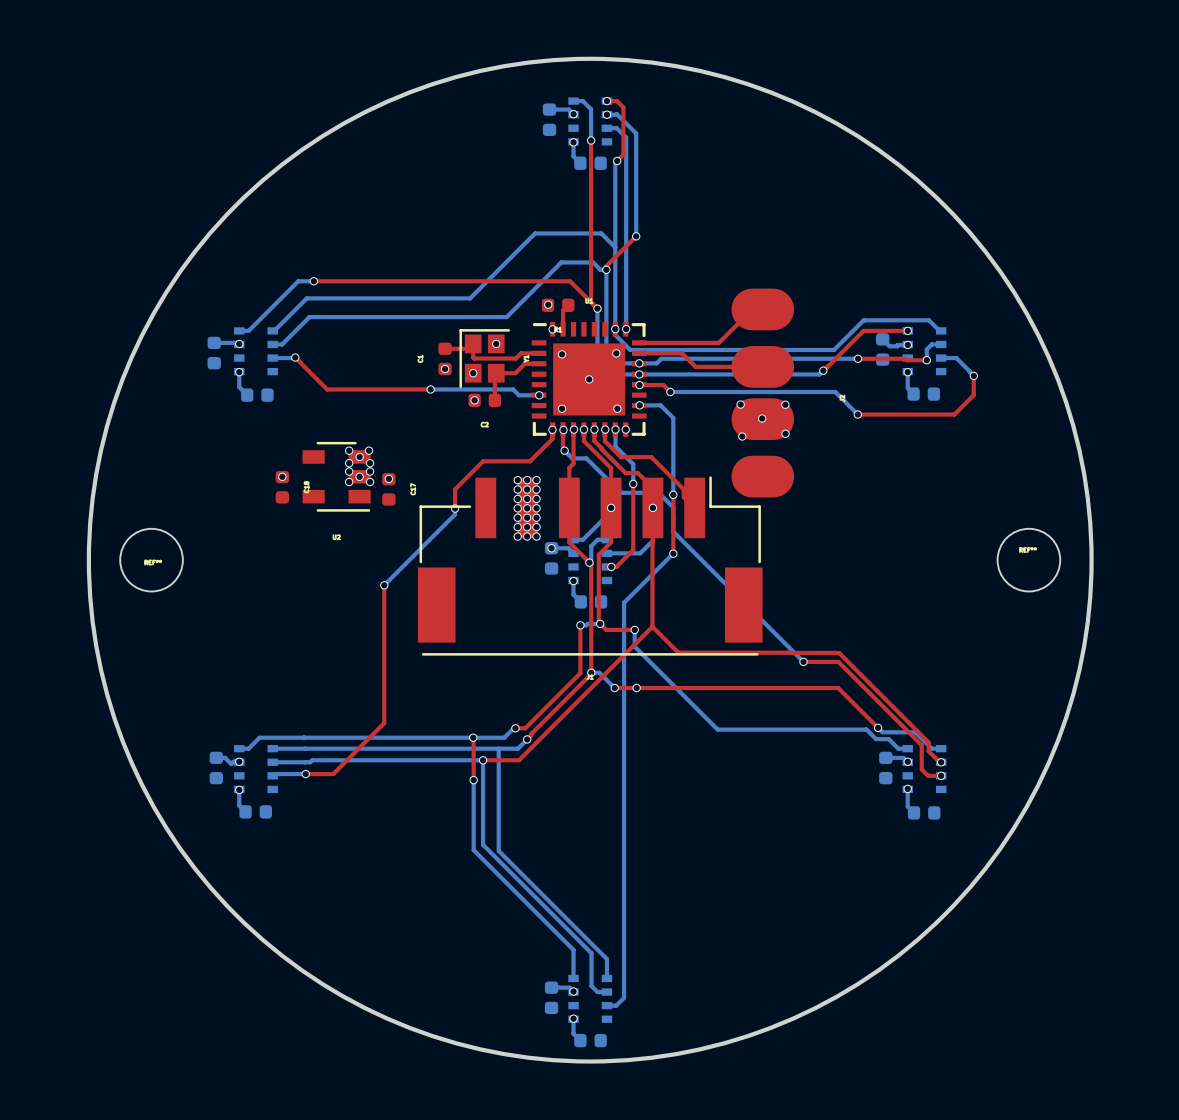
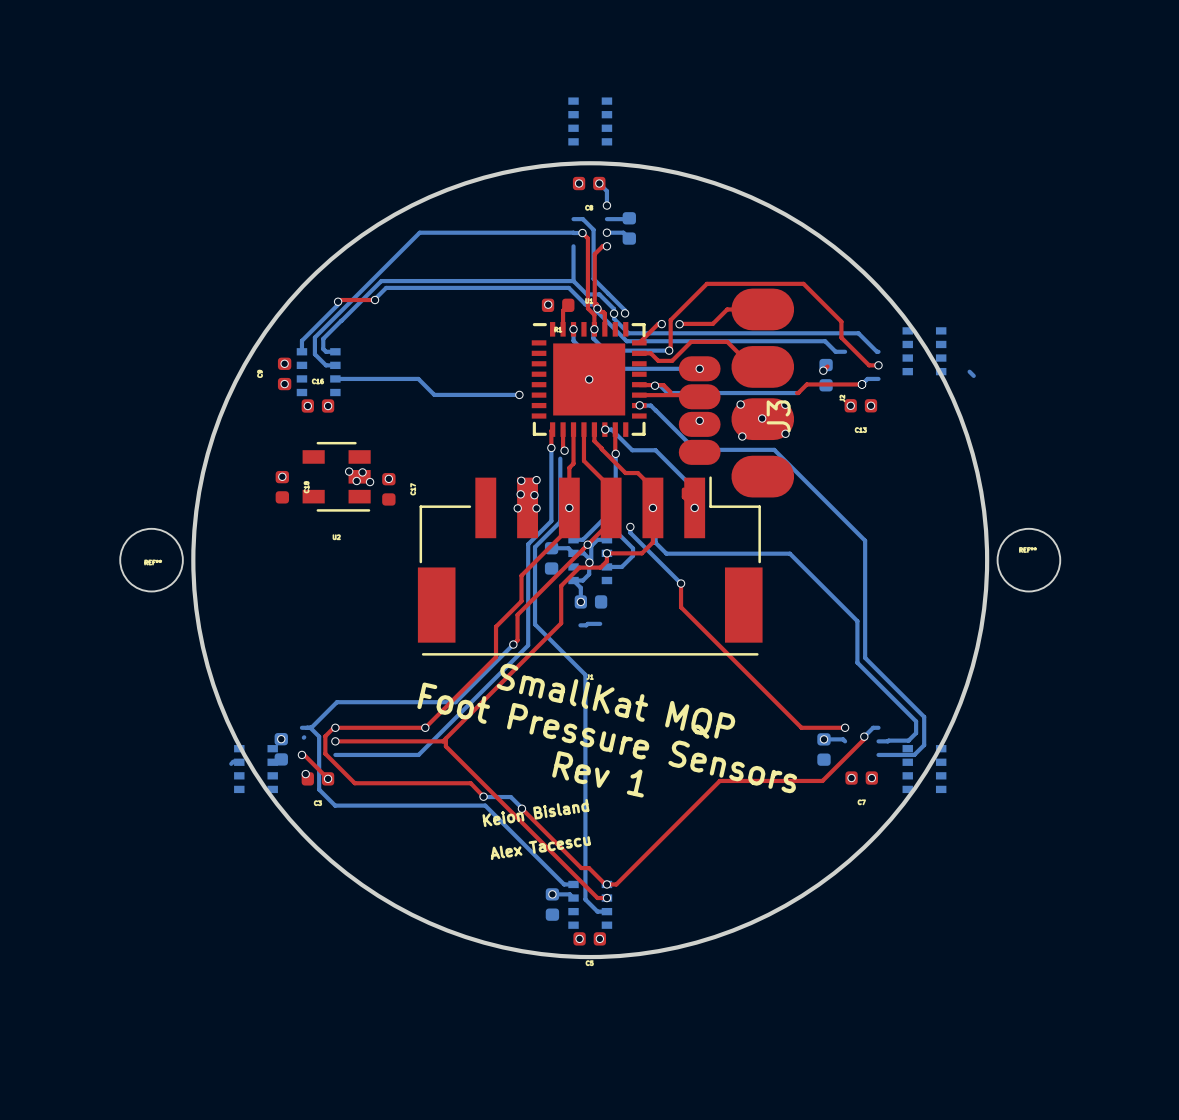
round board edge size: [86, 56, 1094, 1064] -> [191, 161, 990, 960]
bottom track: (573, 101) (582, 101) (591, 109) (591, 140) -> none
top track: (606, 101) (617, 101) (623, 107) (623, 154) (617, 160) -> none
via: (606, 101) -> none
bottom track: (549, 109) (568, 109) (573, 114) -> none
via: (573, 114) -> none
bottom track: (606, 114) (616, 114) (636, 133) (636, 236) -> none
via: (606, 114) -> none
part position: (549, 119) -> (629, 228)
bottom track: (606, 128) (616, 128) (626, 137) (626, 329) -> none
top track: (591, 140) (591, 302) -> none
via: (591, 140) -> none
bottom track: (573, 141) (573, 156) (580, 163) -> none
via: (573, 142) -> none
bottom track: (617, 160) (615, 162) (615, 335) (630, 350) (834, 350) (863, 320) (929, 320) (941, 330) -> none
via: (617, 160) -> none
part side: bottom (590, 163) -> top (589, 183)
via: none -> (579, 183)
bottom track: none -> (599, 183) (606, 191) (606, 205)
via: none -> (599, 183)
via: none -> (606, 205)
bottom track: none -> (629, 218) (606, 219)
bottom track: none -> (573, 219) (582, 219) (593, 229) (593, 278) (625, 310) (625, 313)
bottom track: none -> (606, 232) (623, 232) (629, 238)
via: none -> (606, 232)
top track: none -> (582, 233) (587, 238) (587, 308) (594, 314) (594, 329)
bottom track: none -> (582, 233) (419, 232) (314, 337) (314, 354) (325, 365) (335, 365)
via: none -> (582, 233)
top track: (636, 236) (606, 266) (606, 269) -> none
via: (636, 236) -> none
bottom track: none -> (573, 246) (573, 281)
top track: none -> (606, 246) (602, 246) (594, 254) (594, 305) (596, 304) (601, 311) (604, 313) (604, 329)
via: none -> (606, 246)
bottom track: (615, 247) (601, 233) (535, 233) (470, 298) (306, 298) (272, 330) -> none
via: (606, 269) -> none
top track: (313, 281) (570, 281) (597, 308) -> none
bottom track: (313, 281) (298, 281) (248, 330) (239, 330) -> none
via position: (313, 281) -> (338, 301)
bottom track: none -> (573, 281) (586, 294) (599, 294) (614, 309) (614, 318) (628, 333) (858, 333) (878, 351)
bottom track: none -> (573, 281) (381, 281) (341, 320)
top track: none -> (375, 300) (339, 300) (338, 301)
bottom track: none -> (375, 300) (386, 287) (568, 287) (585, 304) (596, 304) (596, 311) (626, 341) (825, 341) (835, 351) (845, 351)
via: none -> (375, 300)
bottom track: none -> (338, 301) (337, 305) (301, 340) (301, 351)
bottom track: (597, 308) (597, 360) (611, 374) (819, 374) (823, 370) -> none
top track: (752, 309) (718, 342) (639, 342) -> (752, 309) (727, 309) (712, 323) (679, 324)
via: none -> (614, 313)
via: none -> (625, 313)
bottom track: none -> (341, 320) (323, 338) (323, 349) (325, 351) (335, 351)
top track: none -> (661, 324) (658, 324) (639, 342)
via: none -> (661, 324)
via: none -> (679, 324)
via: (552, 329) -> none
bottom track: none -> (573, 329) (573, 340) (601, 368) (699, 368)
via: none -> (573, 329)
bottom track: none -> (594, 329) (593, 338) (605, 350) (669, 350)
via: none -> (594, 329)
via: (615, 329) -> none
via: (626, 329) -> none
top track: (907, 330) (863, 330) (827, 366) -> none
via: (907, 330) -> none
bottom track: (882, 339) (889, 346) (907, 344) -> none
bottom track: (214, 342) (239, 344) -> none
via: (239, 343) -> none
via: (496, 343) -> none
bottom track: (272, 344) (282, 344) (309, 317) (506, 317) (561, 262) (593, 262) (600, 269) (606, 269) (606, 356) (613, 363) (656, 363) (661, 358) (858, 358) -> none
via: (907, 344) -> none
bottom track: (941, 344) (931, 344) (926, 349) (926, 360) -> none
top track: (445, 348) (468, 348) (473, 343) (474, 358) (515, 358) (521, 353) (539, 353) -> none
part position: (882, 349) -> (826, 375)
top track: none -> (669, 350) (670, 320) (706, 283) (803, 283) (841, 321) (841, 337) (869, 365) (878, 365)
via: none -> (669, 350)
part position: (256, 351) -> (318, 372)
part side: bottom (214, 353) -> top (284, 373)
via: (616, 353) -> none
top track: (650, 353) (682, 353) (695, 366) (752, 366) -> (650, 353) (658, 360) (672, 360) (691, 341) (727, 341) (752, 366)
via: (562, 354) -> none
top track: (295, 357) (327, 389) (430, 389) -> none
bottom track: (295, 357) (272, 358) -> none
via position: (295, 357) -> (284, 363)
part: (445, 358) -> none
part: (484, 358) -> none
top track: (858, 358) (926, 360) -> none
via: (858, 358) -> none
bottom track: (941, 358) (956, 358) (969, 371) -> none
via: (926, 360) -> none
top track: (539, 363) (524, 363) (515, 373) (496, 373) (494, 400) -> none
via: (639, 363) -> none
via: none -> (878, 365)
via: none -> (699, 368)
via: (445, 369) -> none
bottom track: (239, 371) (239, 387) (247, 395) -> none
bottom track: (907, 371) (907, 388) (913, 394) -> none
via: (239, 372) -> none
via: (907, 372) -> none
via: (473, 373) -> none
via: (639, 374) -> none
top track: (973, 375) (973, 395) (954, 414) (857, 414) -> none
via: (973, 375) -> none
bottom track: none -> (335, 378) (418, 378) (434, 394) (519, 394)
bottom track: none -> (878, 378) (867, 378) (862, 384)
via: none -> (284, 384)
top track: none -> (862, 384) (806, 384) (797, 393)
via: none -> (862, 384)
via: (639, 385) -> none
bottom track: none -> (654, 385) (660, 385) (667, 393) (797, 393)
via: none -> (654, 385)
bottom track: (430, 389) (513, 389) (519, 395) (539, 395) -> none
via: (430, 389) -> none
bottom track: (670, 391) (835, 391) (857, 414) -> none
via: (670, 391) -> none
top track: none -> (699, 393) (697, 395) (639, 395)
part side: bottom (923, 394) -> top (860, 405)
part side: bottom (257, 395) -> top (317, 405)
via position: (539, 395) -> (519, 394)
via: (474, 400) -> none
part: (484, 400) -> none
via: none -> (307, 405)
via: none -> (328, 405)
bottom track: (639, 405) (660, 405) (673, 418) (673, 494) -> (639, 405) (650, 405) (655, 410)
via: none -> (850, 405)
via: none -> (870, 405)
via: (562, 408) -> none
via: (617, 408) -> none
bottom track: none -> (656, 410) (695, 449) (774, 449) (865, 540) (865, 657) (924, 716) (924, 745) (914, 754) (878, 754)
J3: none -> (699, 410)
via: (857, 414) -> none
via: none -> (699, 420)
top track: (552, 429) (552, 438) (530, 461) (483, 461) (455, 489) (455, 508) -> (552, 429) (551, 447)
via: (552, 429) -> none
via: (573, 429) -> none
via: (583, 429) -> none
via: (594, 429) -> none
top track: (604, 429) (604, 441) (620, 457) (651, 457) (686, 492) (686, 500) -> none
bottom track: none -> (604, 429) (611, 429) (632, 450) (655, 450) (694, 489) (694, 507)
top track: none -> (615, 429) (615, 453)
bottom track: (615, 429) (615, 446) (633, 464) (633, 483) -> none
via: (615, 429) -> none
via: (625, 429) -> none
via: (563, 430) -> none
top track: (583, 441) (611, 468) (611, 488) -> (583, 441) (583, 460) (611, 488)
bottom track: none -> (551, 447) (551, 521) (528, 544) (528, 645) (418, 754) (335, 754)
via: none -> (551, 447)
via: (349, 450) -> none
via: (369, 450) -> none
bottom track: (564, 450) (572, 458) (586, 458) (620, 492) (658, 492) (673, 507) (673, 531) (803, 661) -> none
bottom track: none -> (615, 453) (615, 531) (633, 548) (633, 555) (621, 566) (606, 566)
via: none -> (615, 453)
via: (359, 456) -> none
bottom track: none -> (560, 458) (560, 521) (535, 547) (535, 624) (585, 674) (585, 899) (597, 911) (606, 911)
via: (349, 463) -> none
via: (370, 463) -> none
via: (370, 471) -> none
via: none -> (362, 472)
via: (359, 476) -> none
via: none -> (356, 480)
via: (517, 480) -> none
via: none -> (521, 480)
via: (527, 480) -> none
via: (349, 482) -> none
top track: (633, 483) (633, 550) (616, 566) (606, 566) -> none
via: (633, 483) -> none
via: (517, 489) -> none
via: (527, 489) -> none
via: (536, 489) -> none
via: none -> (520, 494)
top track: (673, 494) (673, 553) -> none
via: (673, 494) -> none
via: none -> (534, 495)
via: (517, 498) -> none
via: (527, 498) -> none
via: (536, 498) -> none
via: none -> (569, 507)
via: (611, 507) -> none
bottom track: (652, 507) (652, 540) (640, 553) (606, 553) -> (652, 507) (655, 510) (655, 542) (666, 553) (789, 553) (857, 621) (857, 662) (916, 721) (916, 733) (908, 740) (878, 741)
via: none -> (694, 507)
bottom track: (455, 508) (455, 514) (384, 585) -> none
via: (455, 508) -> none
via: (527, 508) -> none
via: (517, 517) -> none
via: (527, 517) -> none
via: (536, 517) -> none
top track: (611, 521) (611, 542) (598, 554) (598, 622) (606, 629) (634, 629) -> (611, 521) (517, 614) (517, 640) (513, 644)
bottom track: none -> (630, 526) (630, 532) (681, 583)
via: none -> (630, 526)
via: (517, 527) -> none
via: (527, 527) -> none
via: (536, 527) -> none
top track: (569, 527) (569, 542) (591, 564) (591, 674) (527, 739) -> (569, 527) (521, 575) (521, 601) (496, 626) (496, 657) (425, 727) (333, 727) (325, 736) (325, 753) (354, 783) (470, 783) (484, 797)
via: (517, 536) -> none
via: (527, 536) -> none
via: (536, 536) -> none
top track: (652, 542) (652, 626) -> (652, 542) (641, 553) (606, 553) (606, 561) (600, 567) (579, 567) (561, 585) (561, 623) (443, 741) (335, 741)
via: none -> (587, 544)
via: (551, 548) -> none
bottom track: (673, 553) (624, 602) (624, 997) (616, 1005) (606, 1005) -> none
via: (673, 553) -> none
via position: (611, 566) -> (606, 553)
bottom track: (573, 581) (573, 594) (580, 601) -> (573, 553) (583, 553) (589, 558) (589, 574) (582, 580) (573, 580) (580, 587) (580, 601)
via: (573, 581) -> none
top track: none -> (681, 583) (681, 607) (801, 727) (845, 727)
via: none -> (681, 583)
top track: (384, 585) (384, 723) (333, 774) (305, 774) -> none
via: (384, 585) -> none
via: none -> (580, 601)
via: (600, 623) -> none
top track: (580, 625) (580, 673) (525, 728) (515, 728) -> none
via: (580, 625) -> none
top track: (652, 626) (519, 760) (483, 760) -> none
top track: (652, 626) (678, 652) (788, 652) -> none
bottom track: (634, 629) (634, 646) (717, 729) (866, 729) (876, 739) (888, 739) (898, 748) (907, 748) -> none
via: (634, 629) -> none
bottom track: none -> (513, 644) (455, 702) (336, 702) (311, 727) (301, 727)
via: none -> (513, 644)
top track: (788, 652) (839, 652) (928, 742) (928, 751) (941, 762) -> none
top track: (803, 661) (838, 661) (921, 745) (921, 769) (928, 775) (941, 775) -> none
via: (803, 661) -> none
bottom track: (591, 672) (599, 672) (614, 687) -> none
via: (591, 672) -> none
top track: (614, 687) (838, 687) (878, 727) -> none
via: (614, 687) -> none
via: (636, 687) -> none
text: none -> SmallKat MQP (616, 701)
bottom track: none -> (310, 727) (319, 736) (319, 789) (335, 805) (485, 805) (564, 884) (573, 884)
via: none -> (335, 727)
via: none -> (425, 727)
via: none -> (845, 727)
bottom track: (878, 727) (882, 732) (915, 732) (931, 748) (941, 748) -> (878, 727) (873, 727) (864, 736)
via: (878, 727) -> none
bottom track: (515, 728) (504, 737) (259, 737) (248, 748) (239, 748) -> none
via: (515, 728) -> none
top track: none -> (864, 736) (864, 739) (822, 780) (719, 780) (616, 884) (605, 884) (588, 868) (581, 868) (521, 808)
via: none -> (864, 736)
top track: (473, 737) (473, 780) -> none
via: (473, 737) -> none
text: none -> Foot Pressure Sensors (607, 737)
top track: none -> (445, 738) (445, 746) (597, 898) (606, 898)
via: none -> (281, 739)
bottom track: (527, 739) (517, 748) (272, 748) -> none
via: (527, 739) -> none
bottom track: none -> (823, 739) (843, 739) (845, 741)
via: none -> (823, 739)
via: none -> (335, 741)
bottom track: (498, 748) (498, 850) (606, 959) (606, 978) -> none
top track: none -> (301, 754) (328, 778)
via: none -> (301, 754)
bottom track: (216, 757) (225, 757) (231, 764) -> none
bottom track: (885, 757) (903, 757) (907, 762) -> none
via: (483, 760) -> none
via: (239, 761) -> none
via: (907, 761) -> none
bottom track: (272, 762) (310, 762) (312, 760) (483, 760) (483, 844) (591, 953) (591, 985) (597, 992) (606, 992) -> none
via: (941, 762) -> none
part position: (216, 768) -> (281, 749)
part position: (885, 768) -> (823, 749)
bottom track: (305, 774) (274, 774) (272, 775) -> none
text: none -> Rev 1 (597, 774)
via: (941, 775) -> none
via: none -> (328, 778)
via: none -> (851, 778)
via: none -> (871, 778)
bottom track: (473, 780) (473, 850) (573, 949) (573, 978) -> none
via: (473, 780) -> none
bottom track: (907, 788) (907, 806) (914, 812) -> none
via: (907, 788) -> none
bottom track: (239, 789) (239, 805) (245, 811) -> none
via: (239, 789) -> none
via: none -> (483, 796)
bottom track: none -> (484, 797) (510, 797) (521, 808)
via: none -> (521, 808)
part side: bottom (255, 811) -> top (317, 778)
part side: bottom (924, 812) -> top (861, 778)
text: none -> Keion Bisland (535, 813)
text: none -> Alex Tacescu (540, 848)
via: none -> (606, 884)
bottom track: none -> (552, 894) (569, 894) (573, 898)
via: none -> (552, 894)
via: none -> (606, 898)
via: none -> (579, 938)
via: none -> (599, 938)
bottom track: (551, 987) (569, 987) (573, 991) -> none
via: (573, 991) -> none
part position: (551, 997) -> (552, 904)
part position: (590, 998) -> (590, 904)
bottom track: (573, 1018) (573, 1033) (580, 1040) -> none
via: (573, 1018) -> none
part side: bottom (590, 1040) -> top (589, 938)

